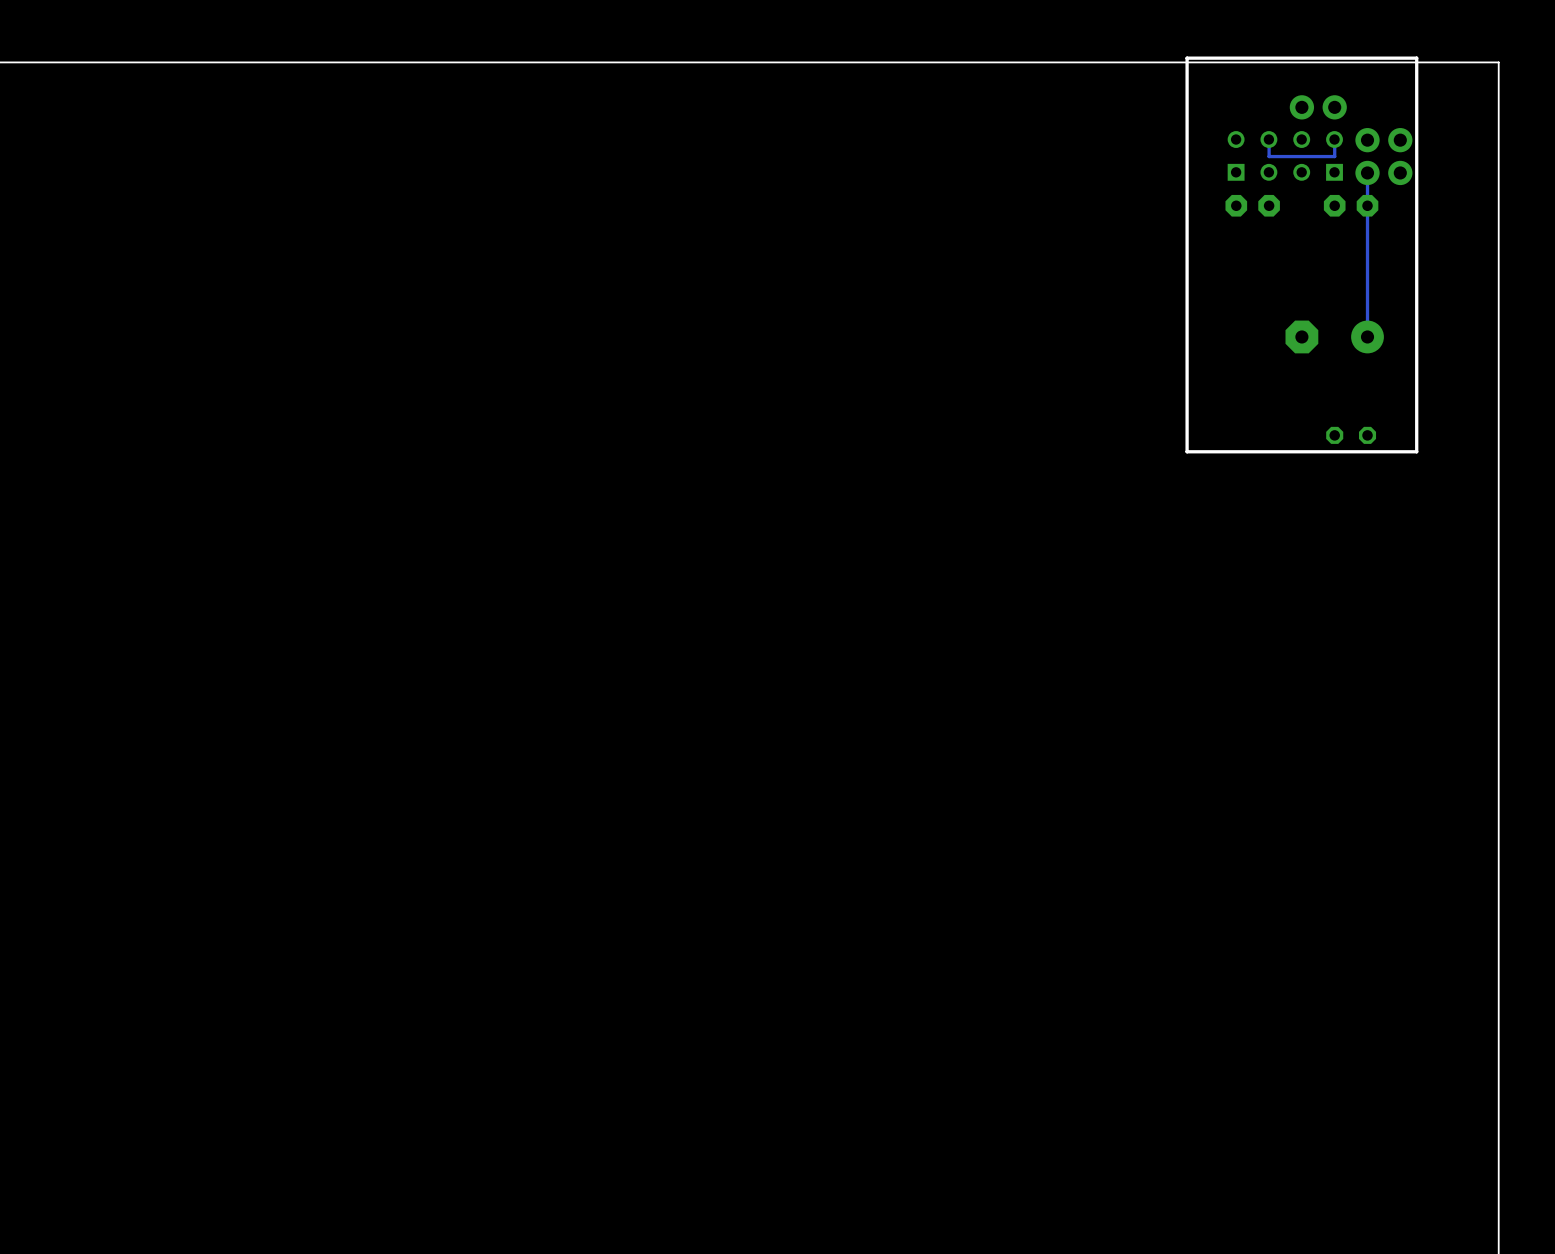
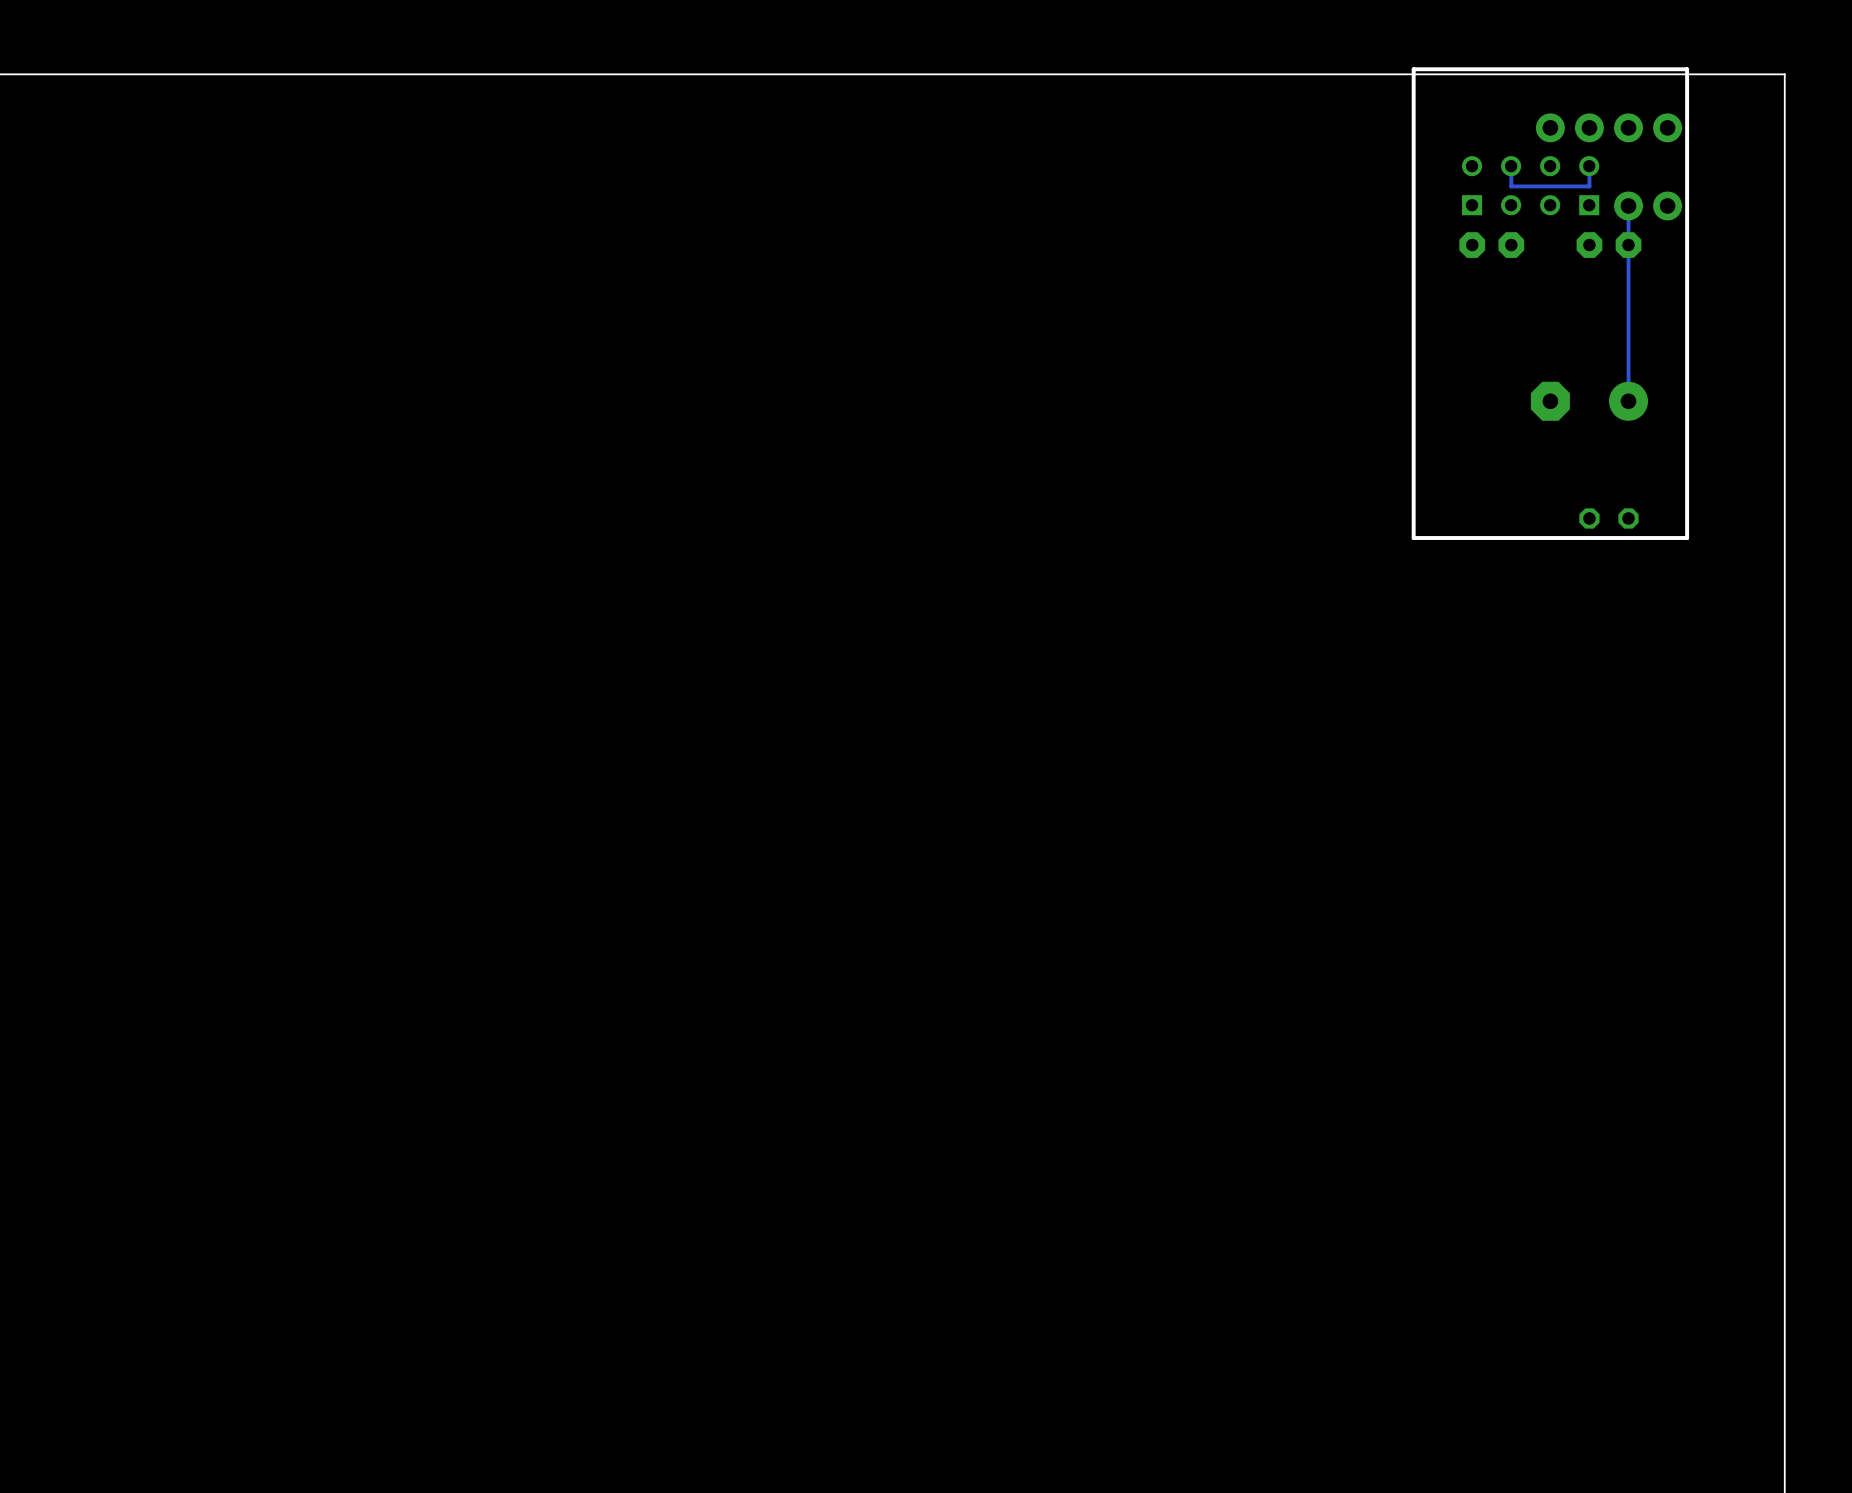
part position: (1383, 140) -> (1648, 127)

